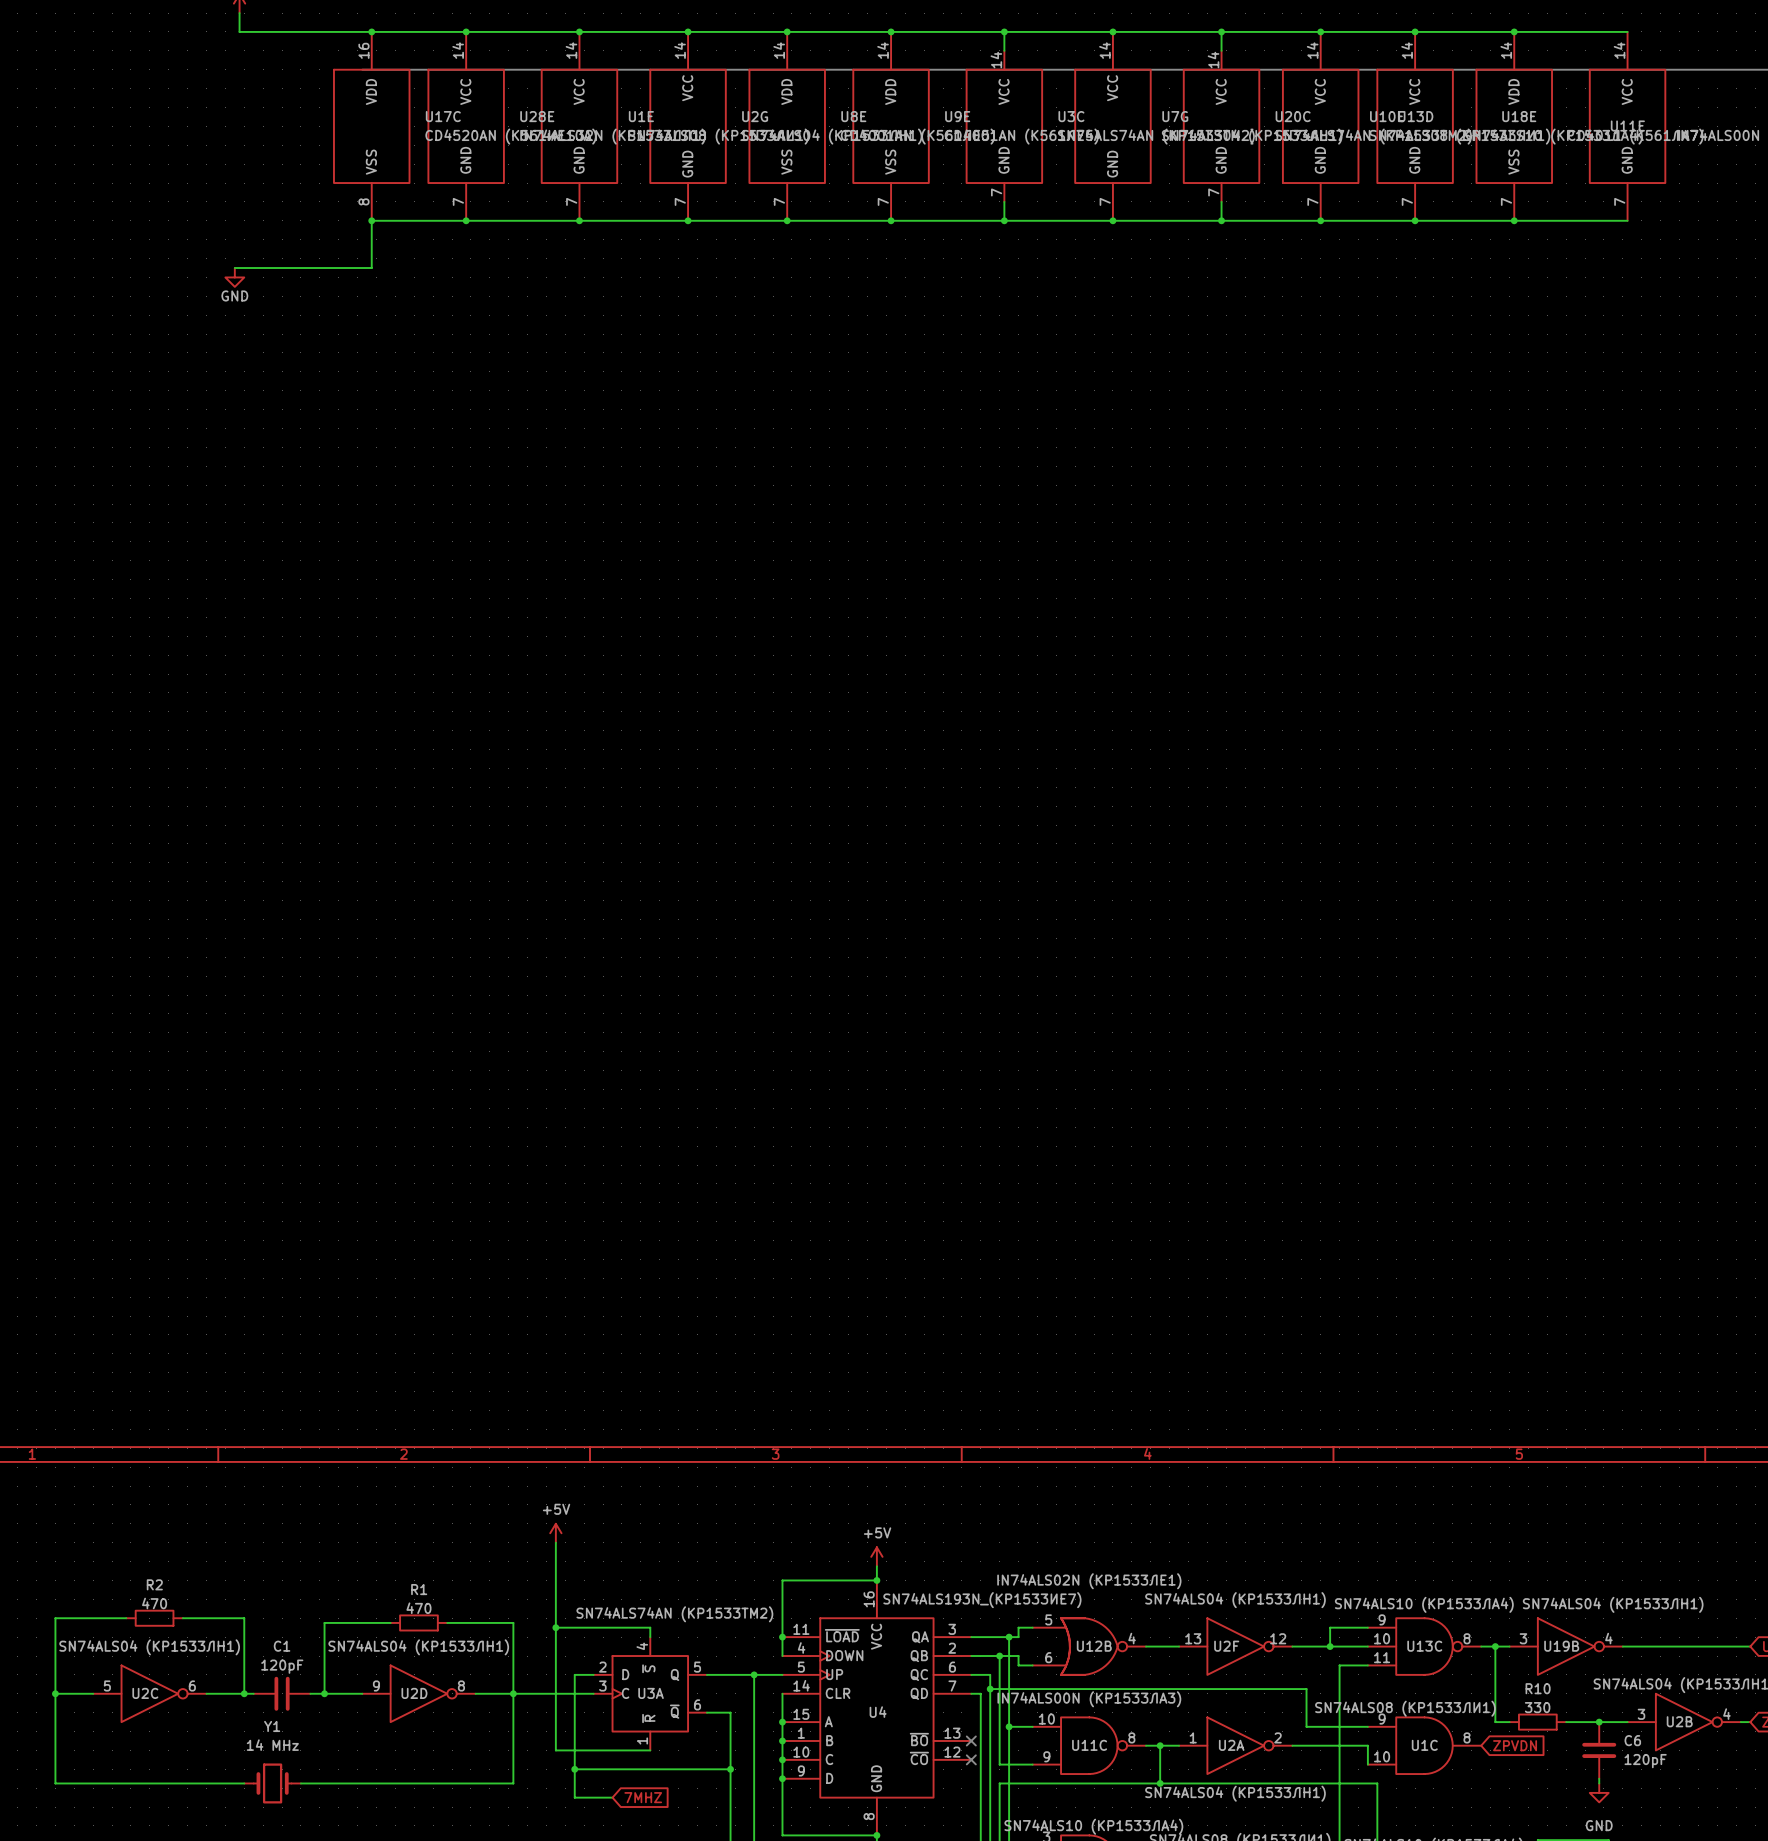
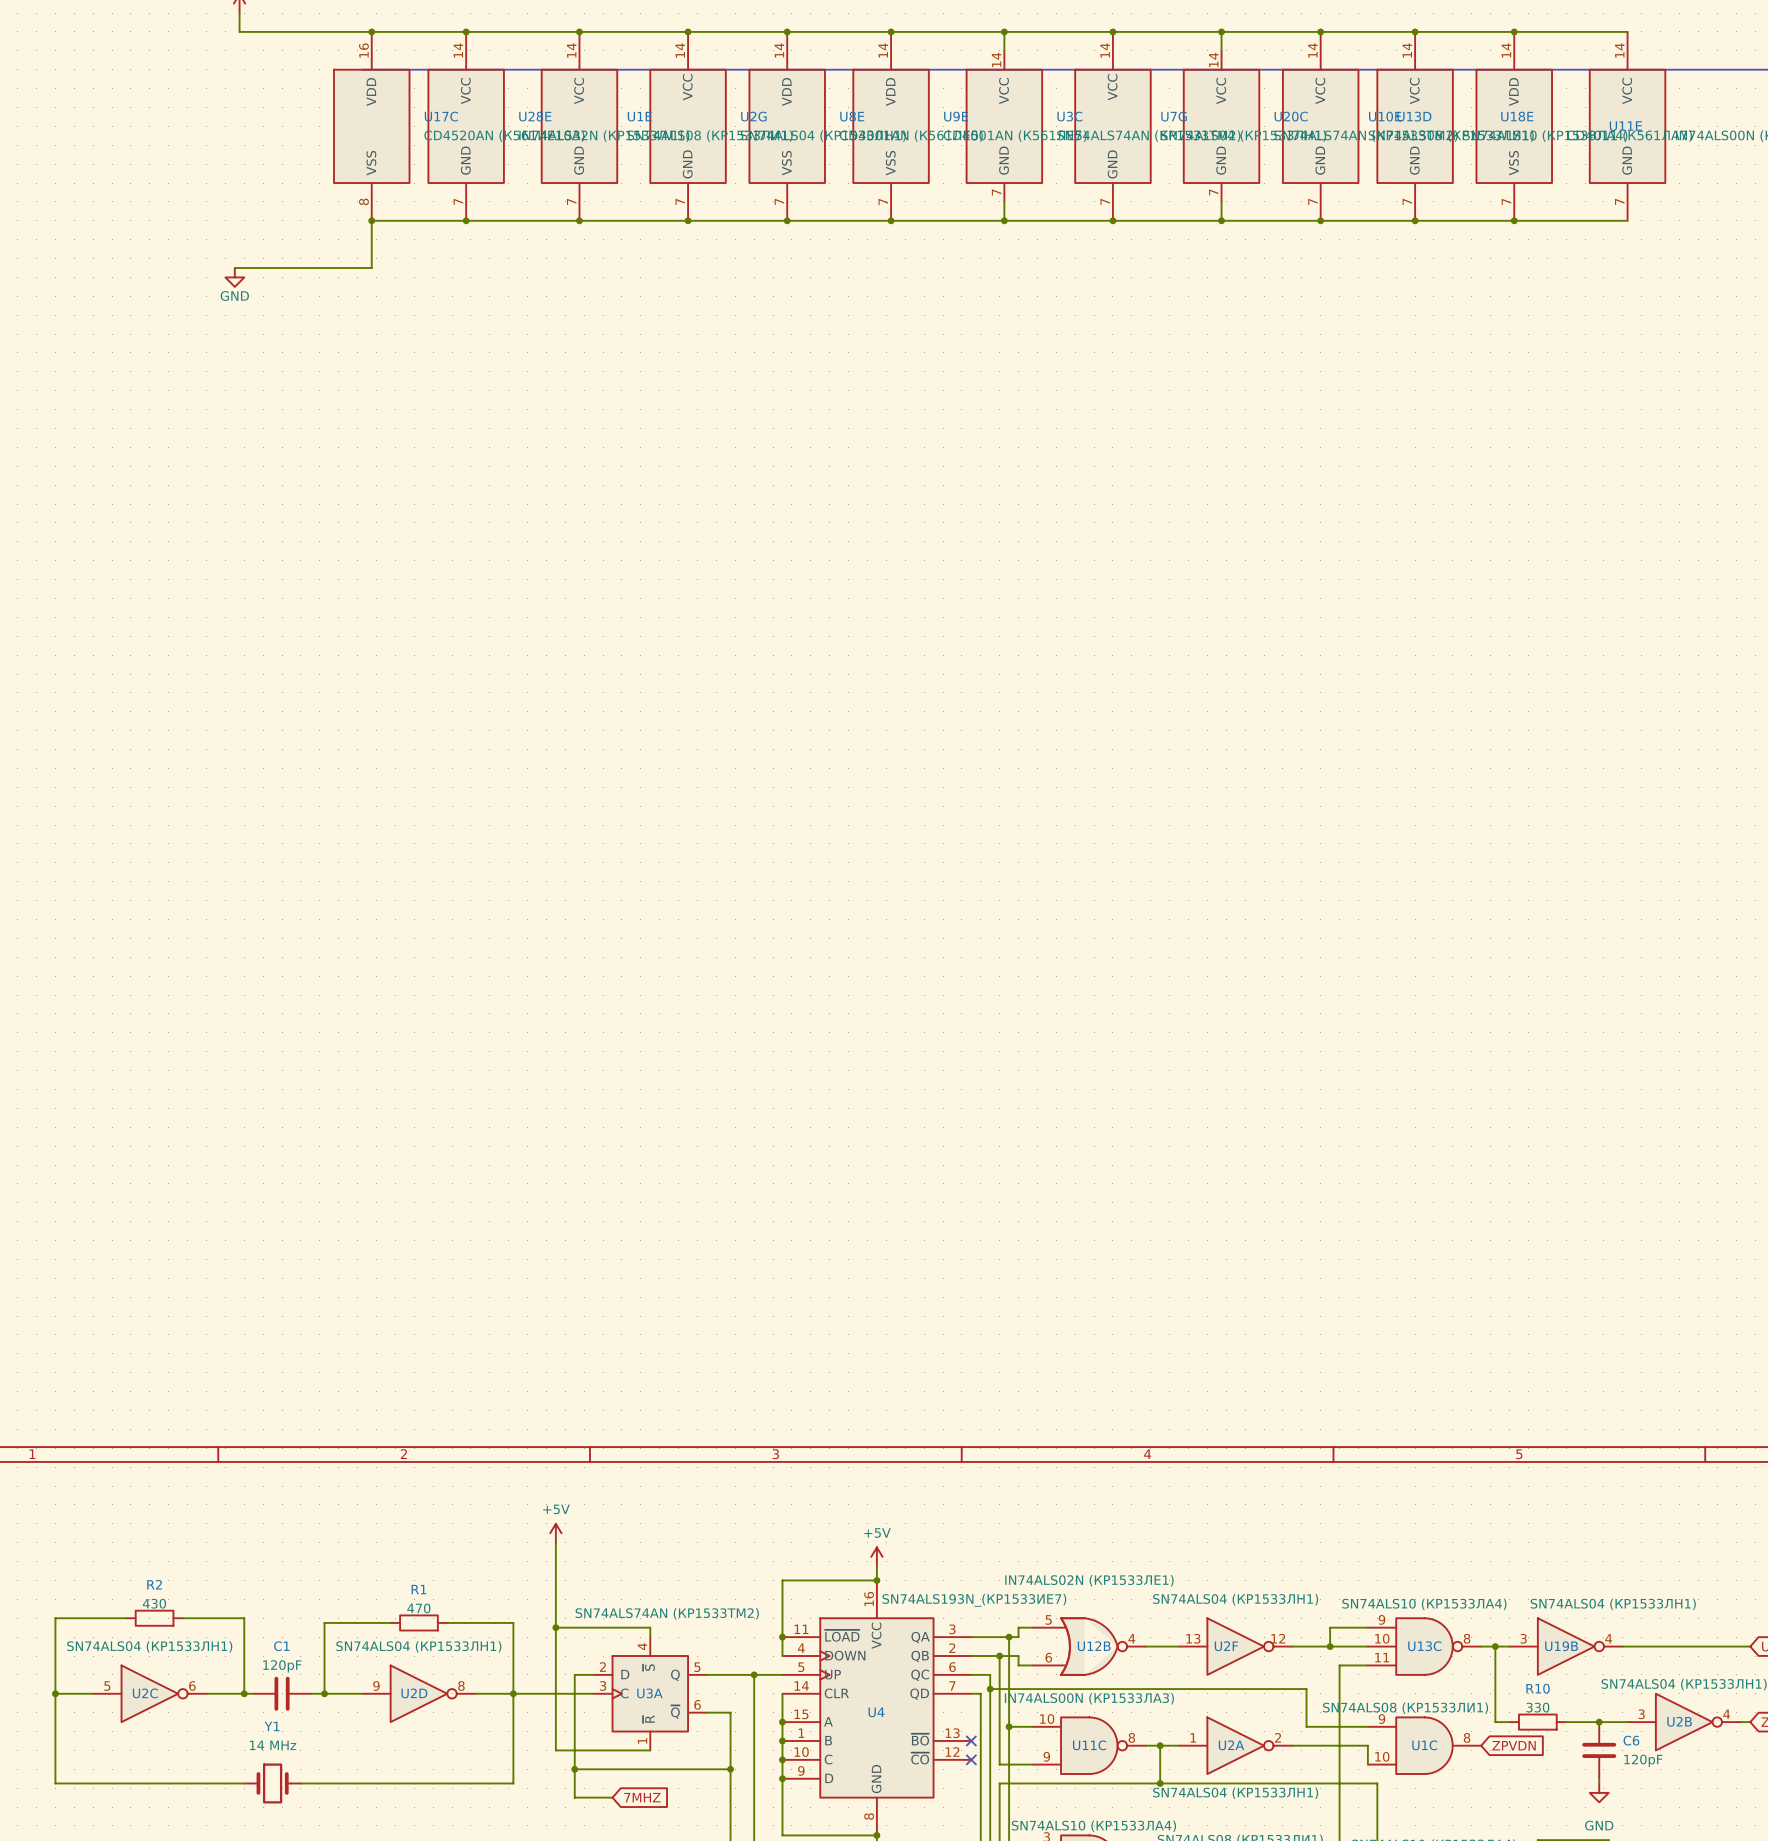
R2 value: 470 (154, 1603) -> 430 (154, 1603)

